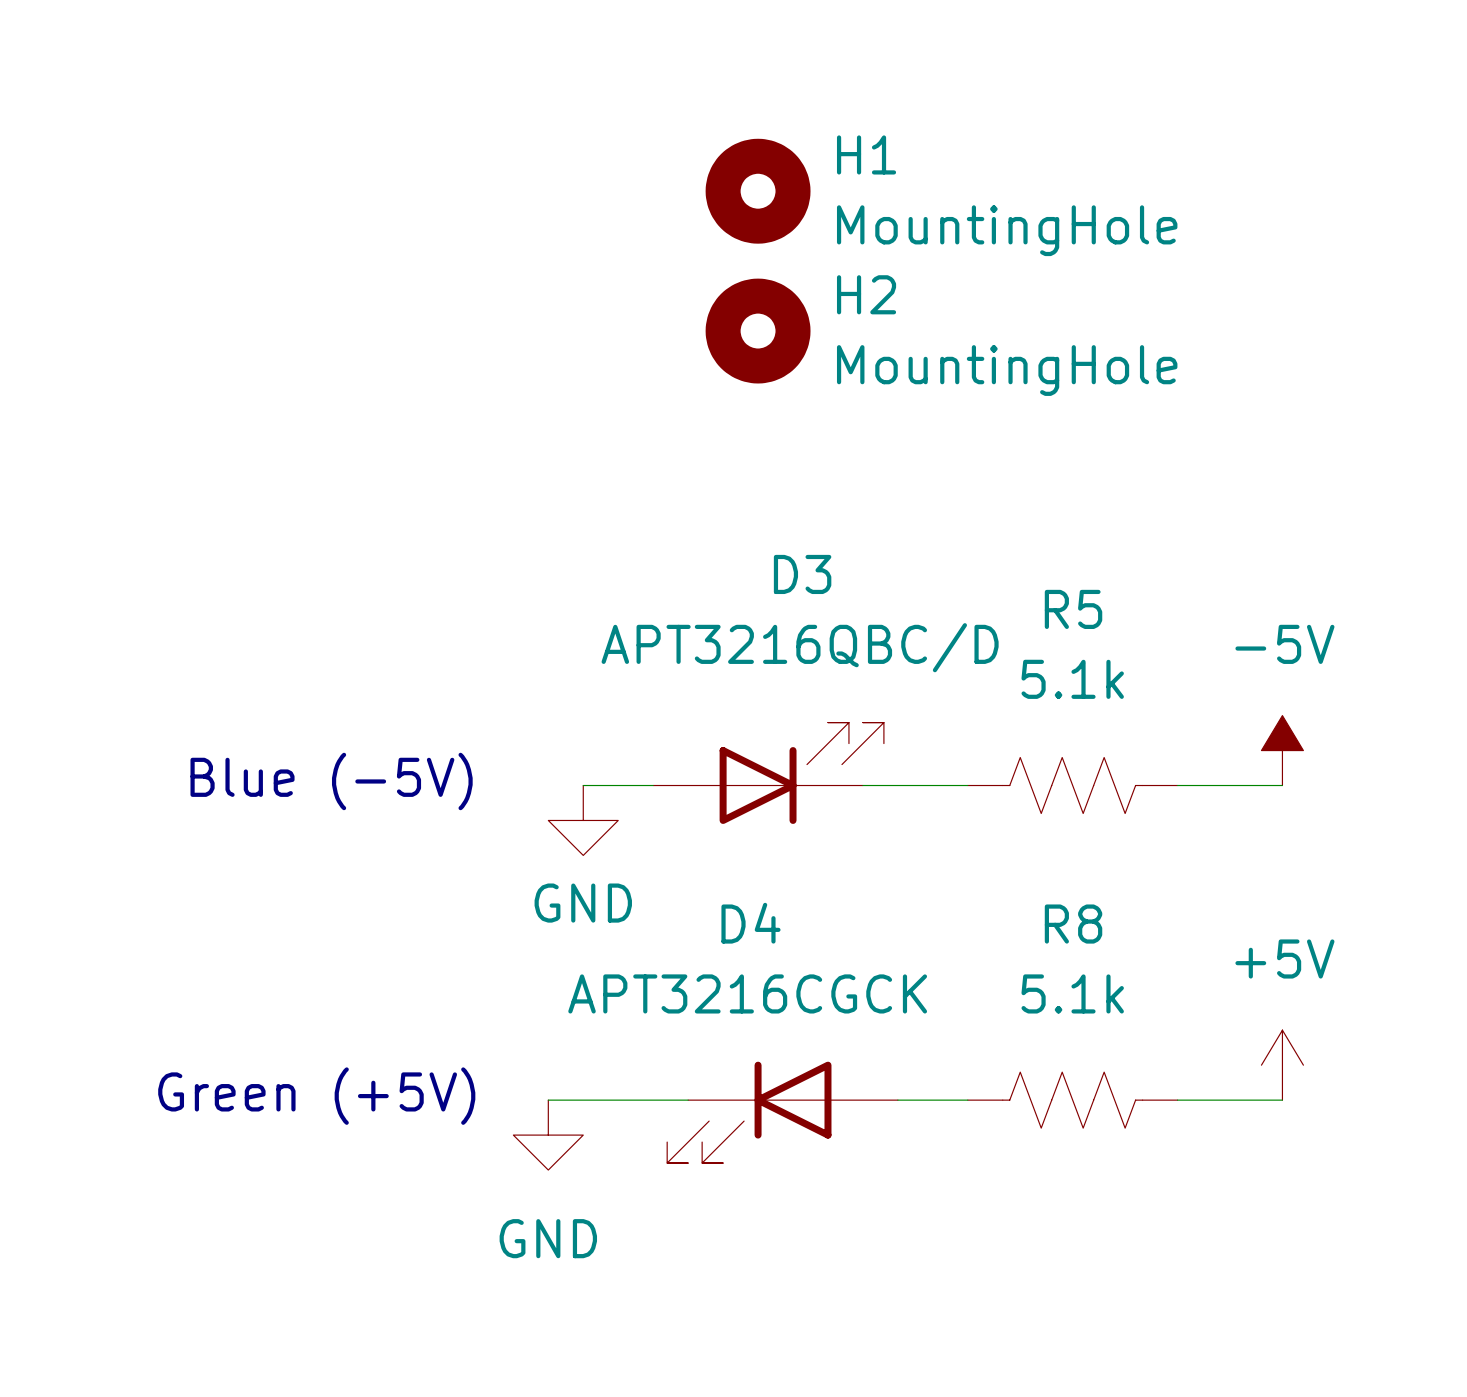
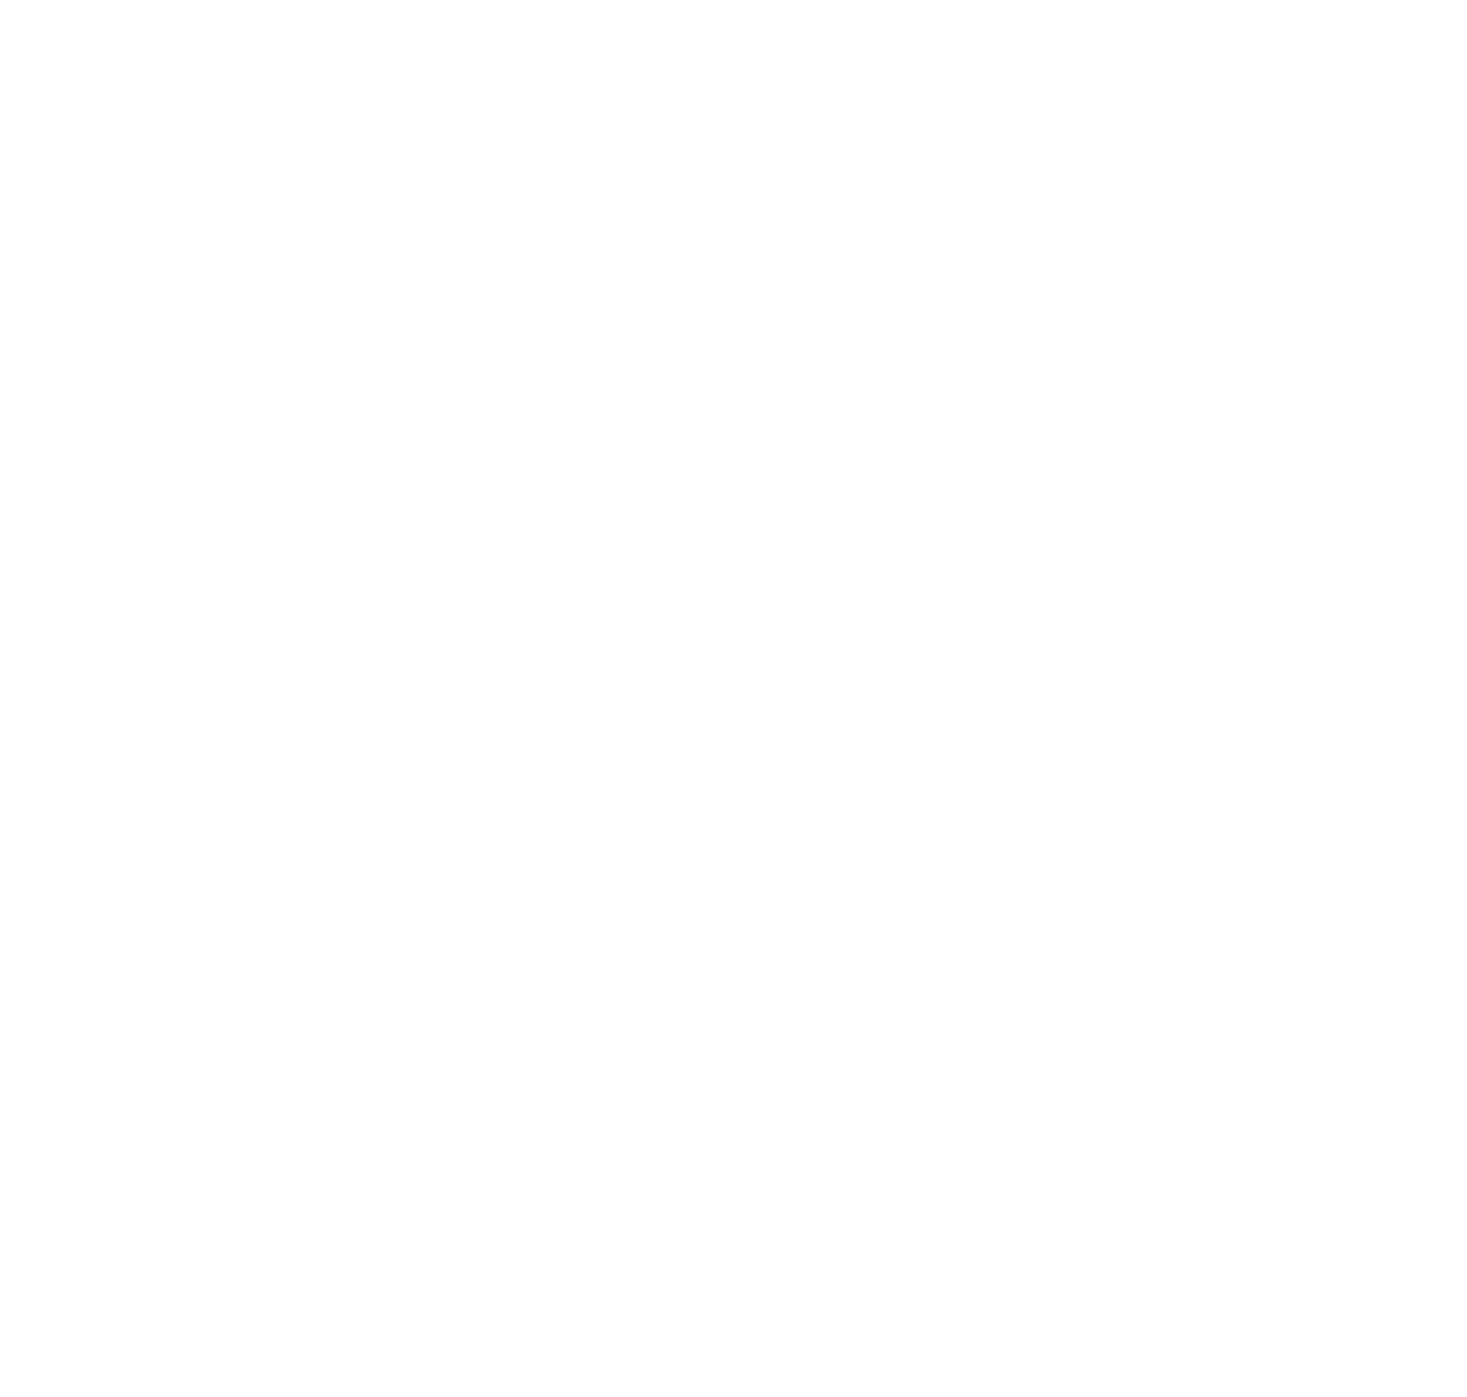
H1: MountingHole (758, 191) -> none
H2: MountingHole (758, 331) -> none
power symbol: -5V (1282, 750) -> none
D3: APT3216QBC/D (768, 773) -> none
text: Blue (-5V) (331, 781) -> none
wire: (583, 785) (653, 785) -> none
wire: (862, 785) (967, 785) -> none
R5: 5.1k (1072, 785) -> none
wire: (1177, 785) (1282, 785) -> none
power symbol: GND (583, 820) -> none
power symbol: +5V (1282, 1065) -> none
text: Green (+5V) (316, 1096) -> none
wire: (548, 1100) (688, 1100) -> none
wire: (897, 1100) (967, 1100) -> none
R8: 5.1k (1072, 1100) -> none
wire: (1177, 1100) (1282, 1100) -> none
D4: APT3216CGCK (782, 1112) -> none
power symbol: GND (548, 1135) -> none

